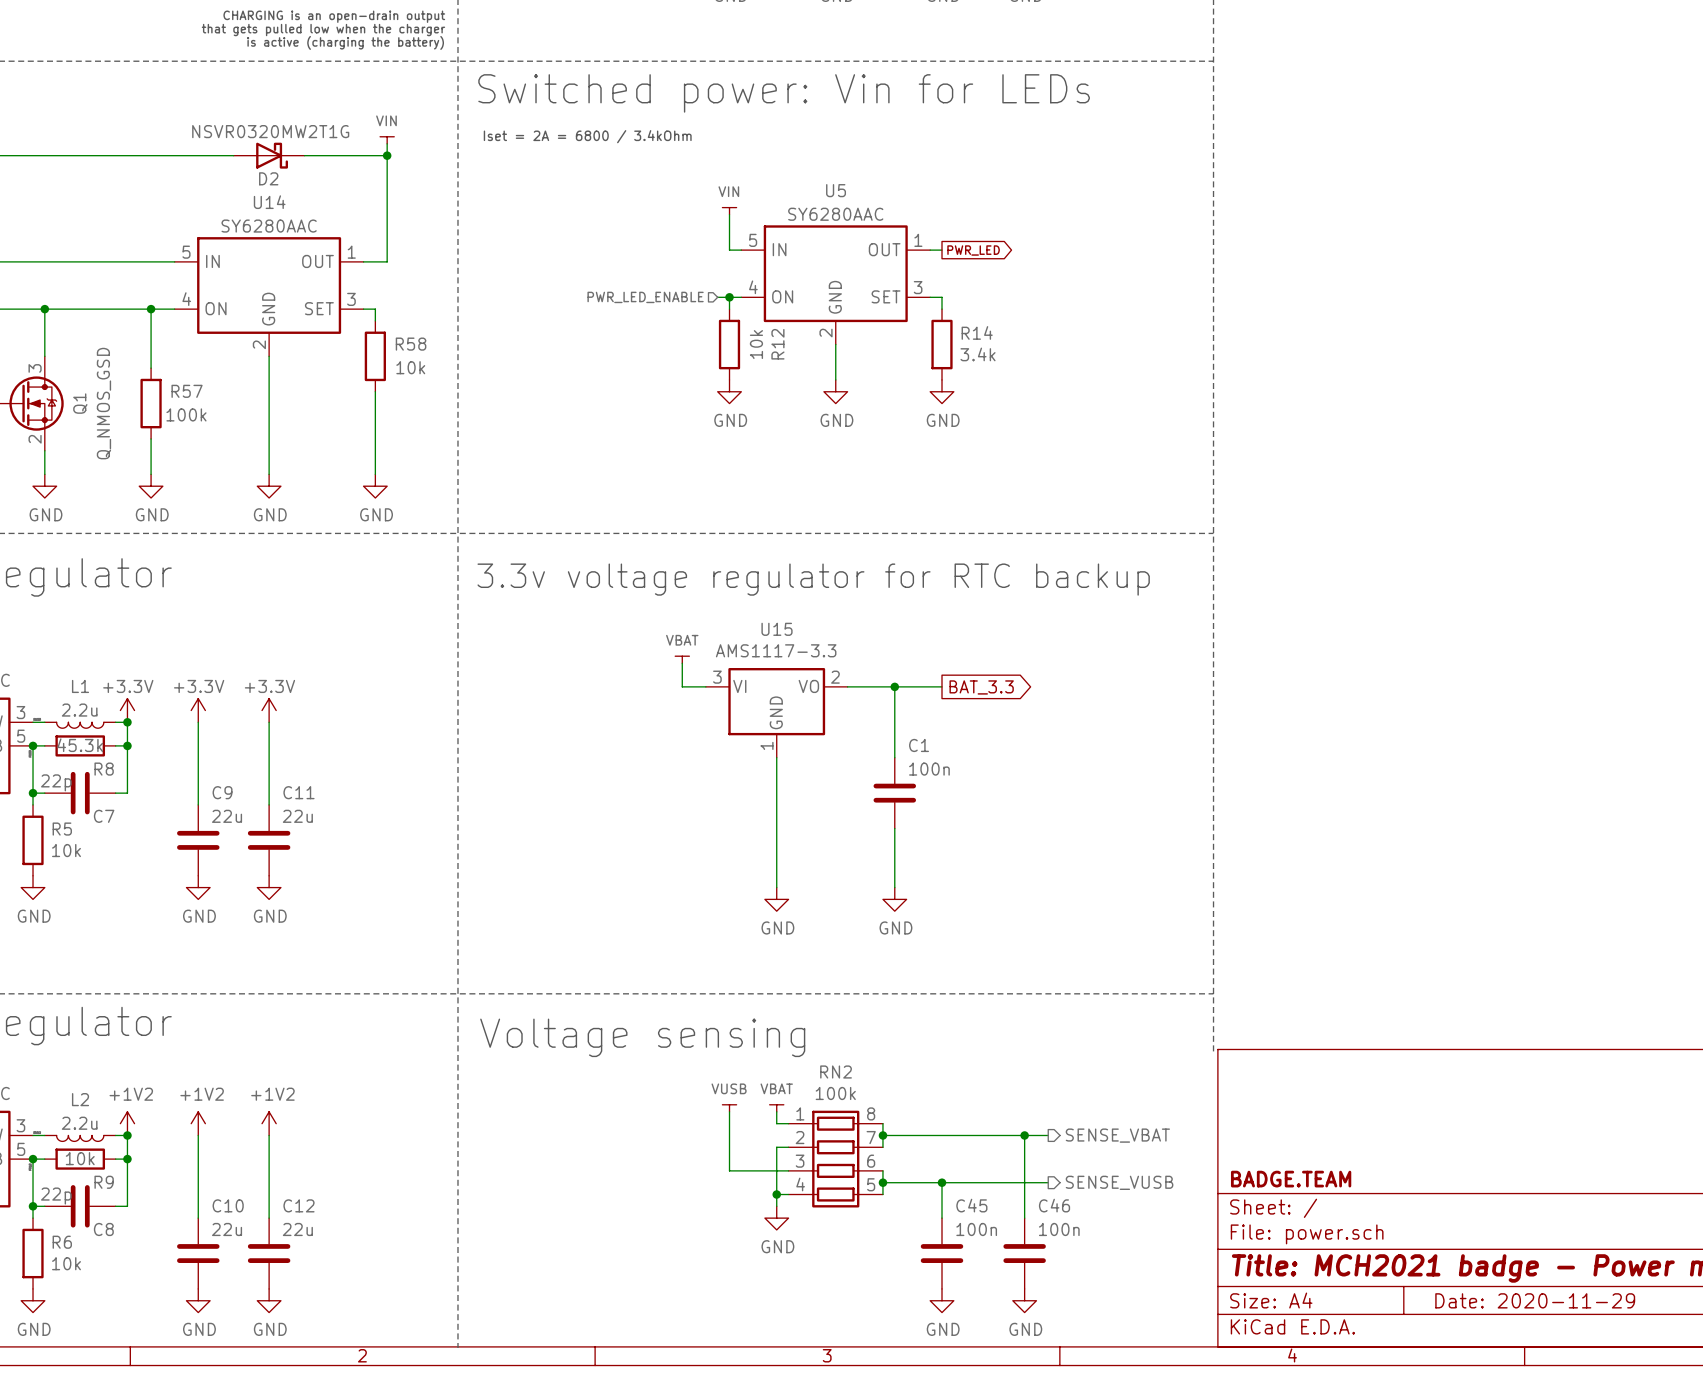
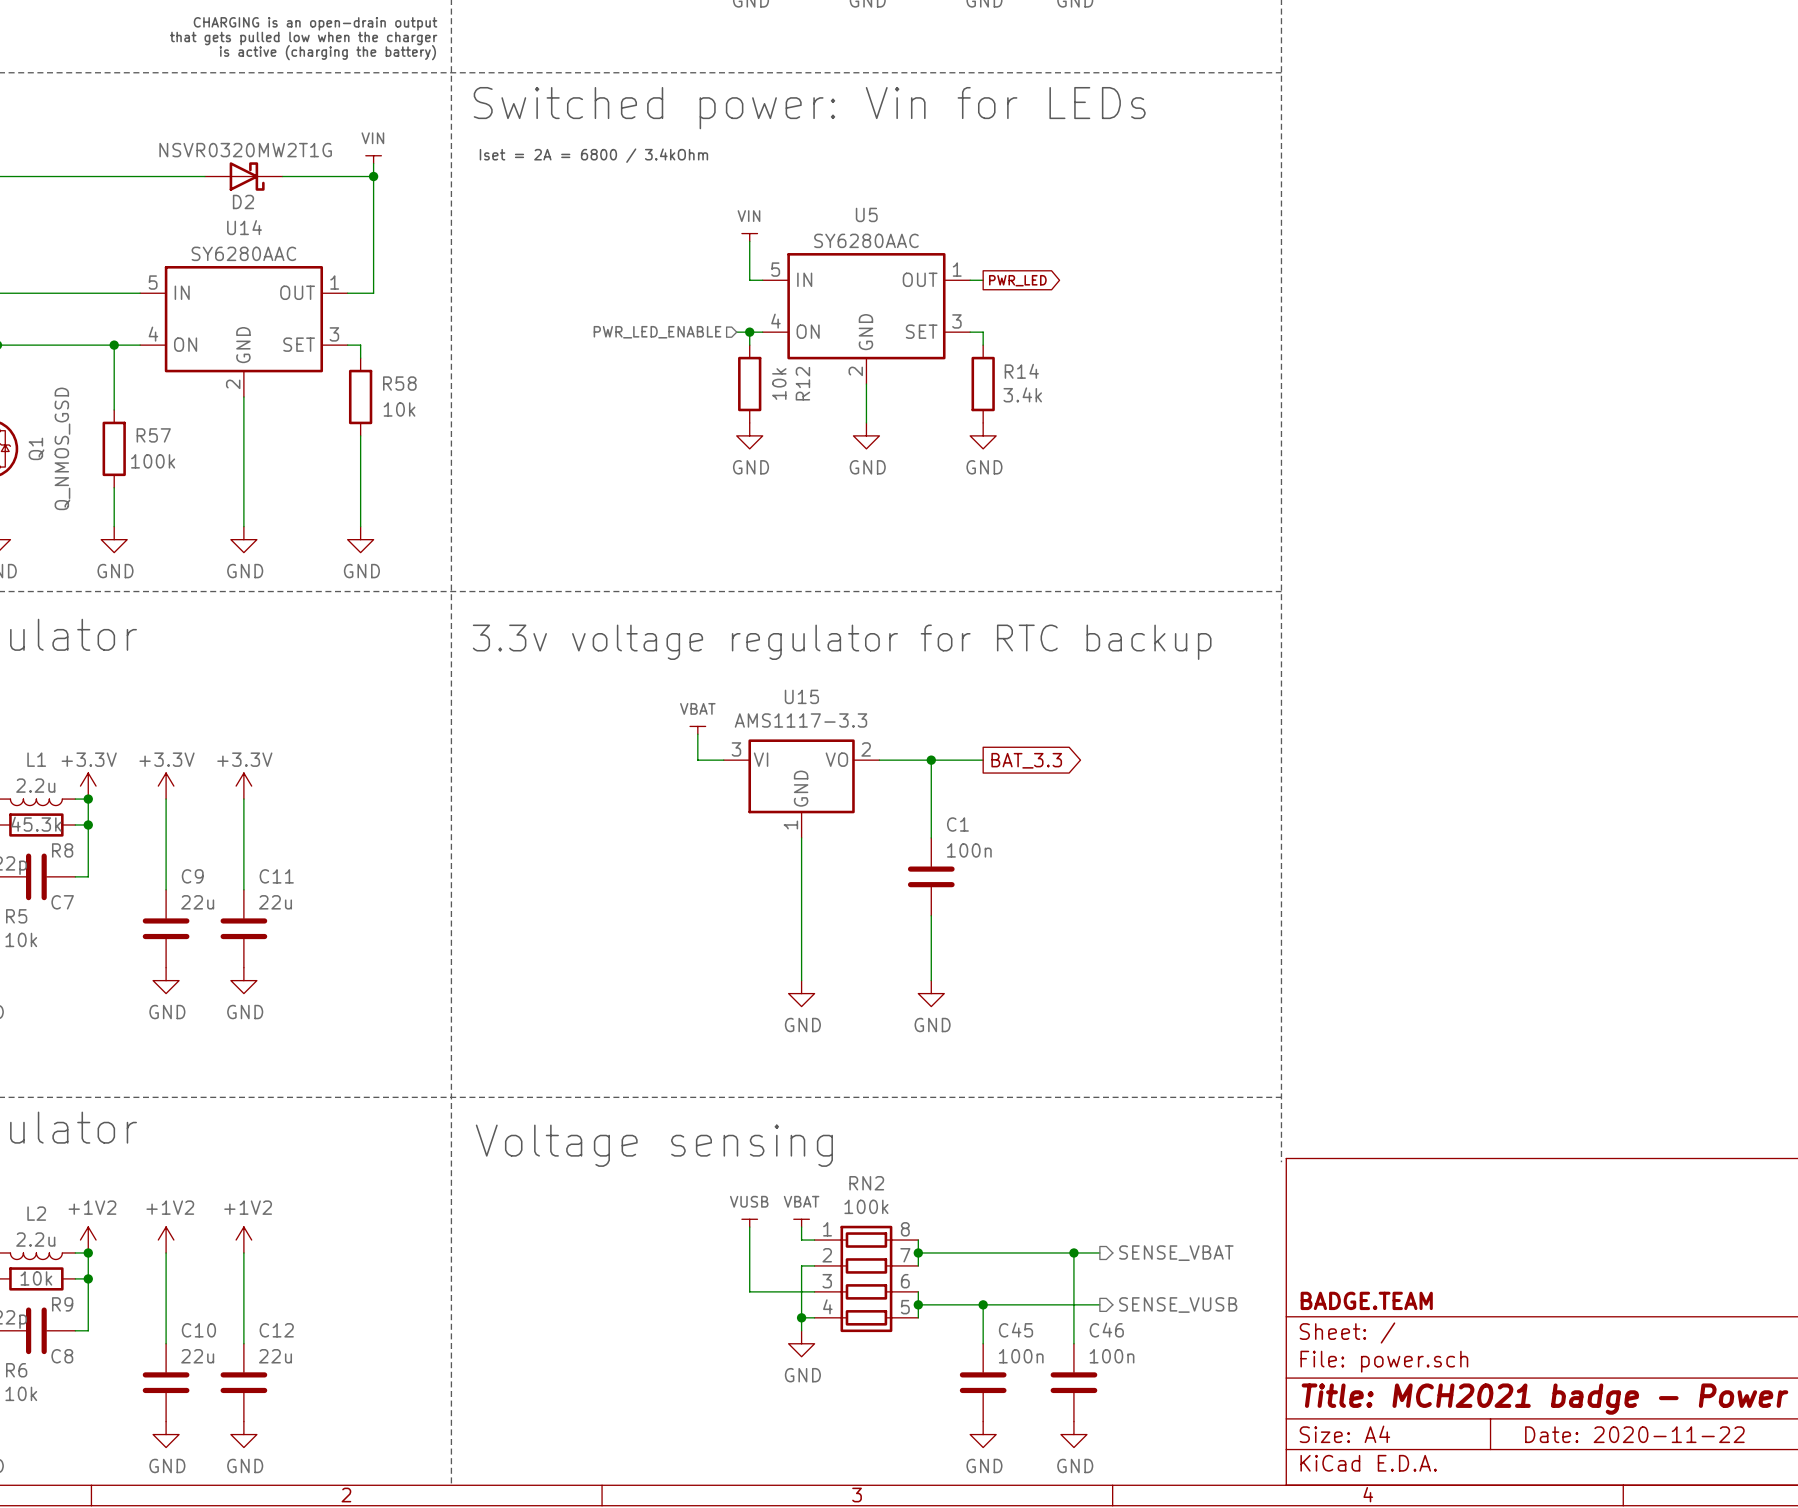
title block: Date: 2020-11-29 (1535, 1300) -> Date: 2020-11-22 (1634, 1434)

